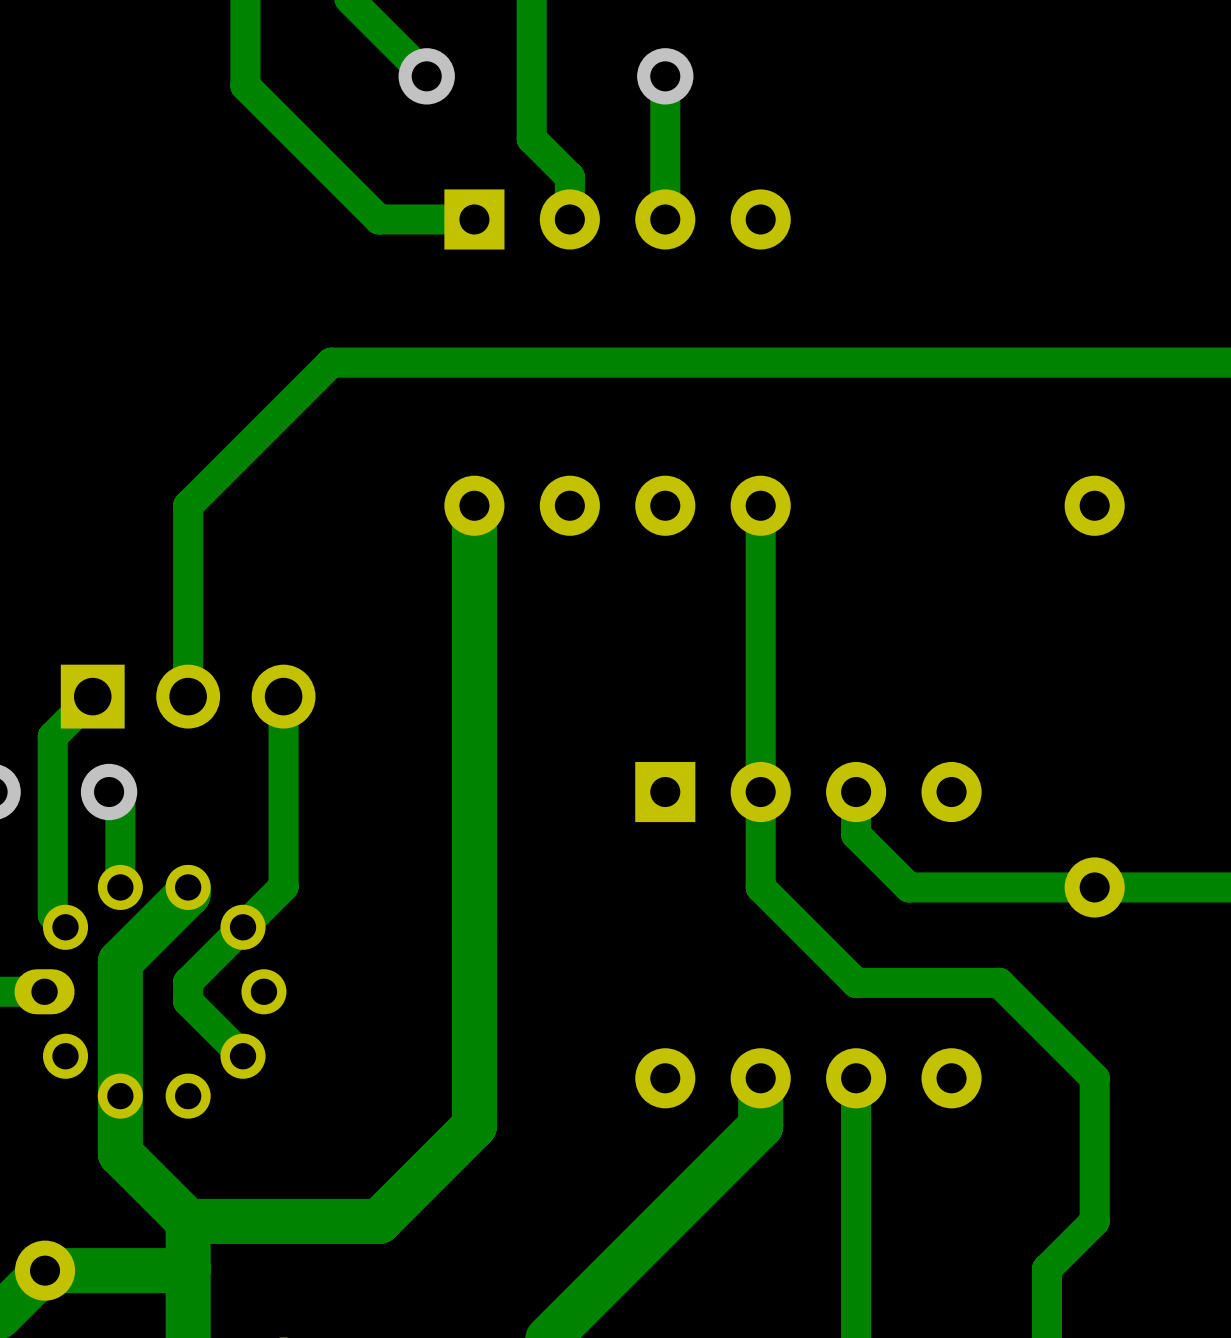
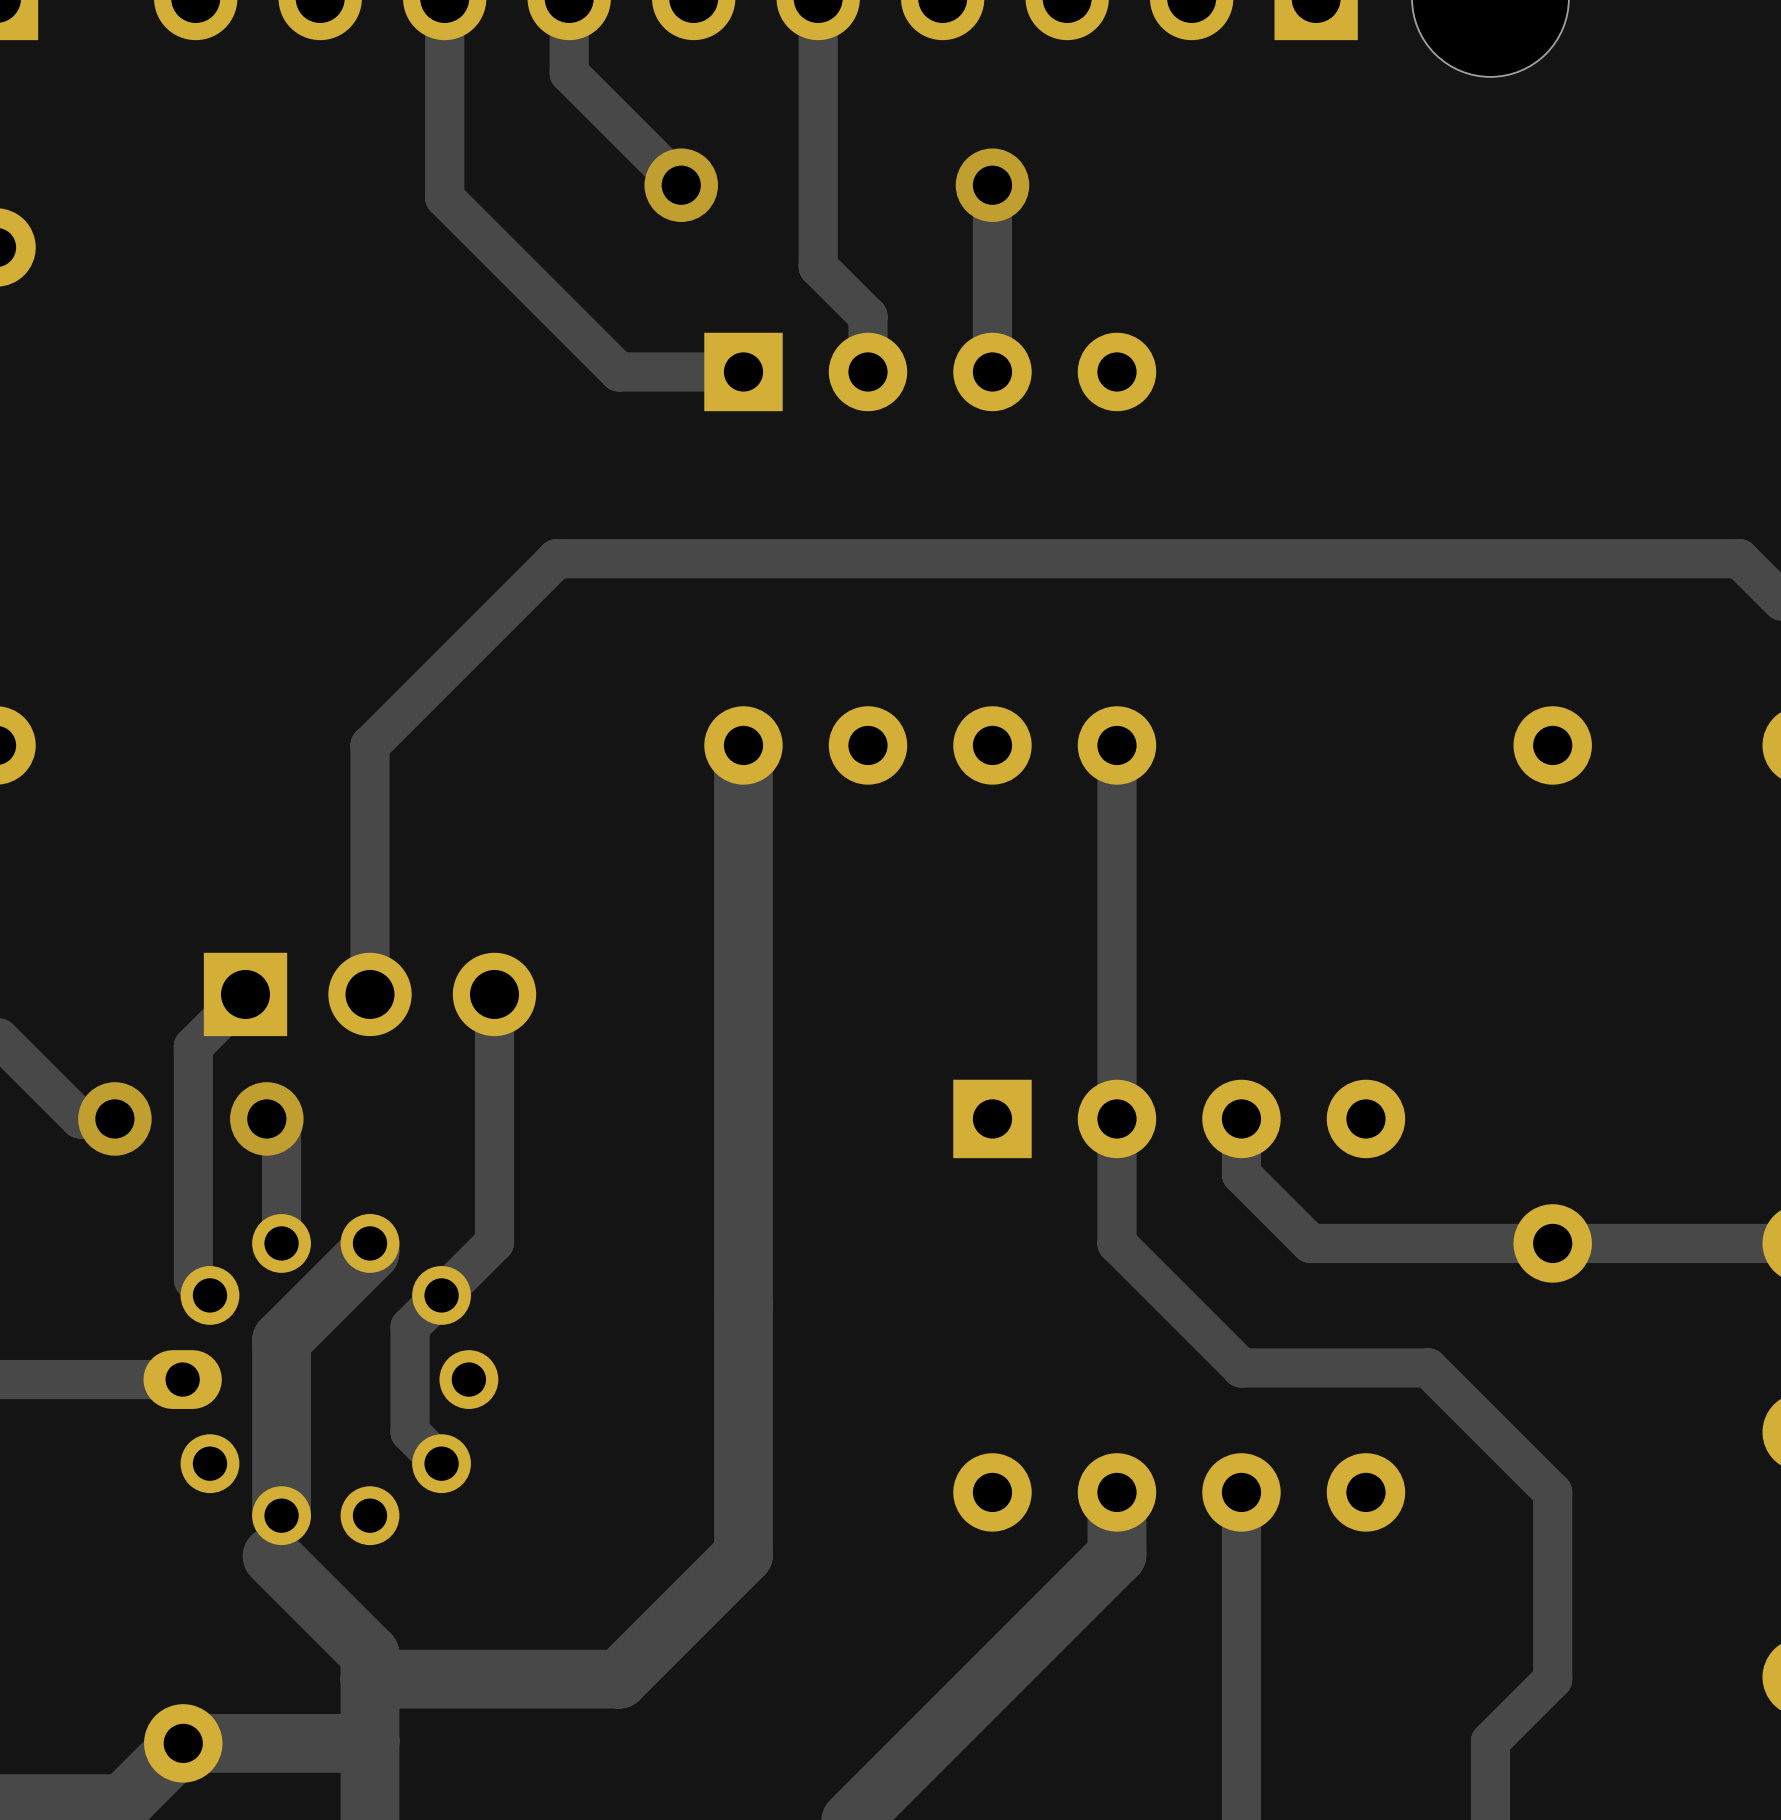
track: (218, 951) (188, 982) (188, 1001) (218, 1032) -> (410, 1326) (410, 1432)
track: (120, 1096) (120, 1153) (188, 1221) -> (271, 1556) (370, 1654) (370, 1679)

